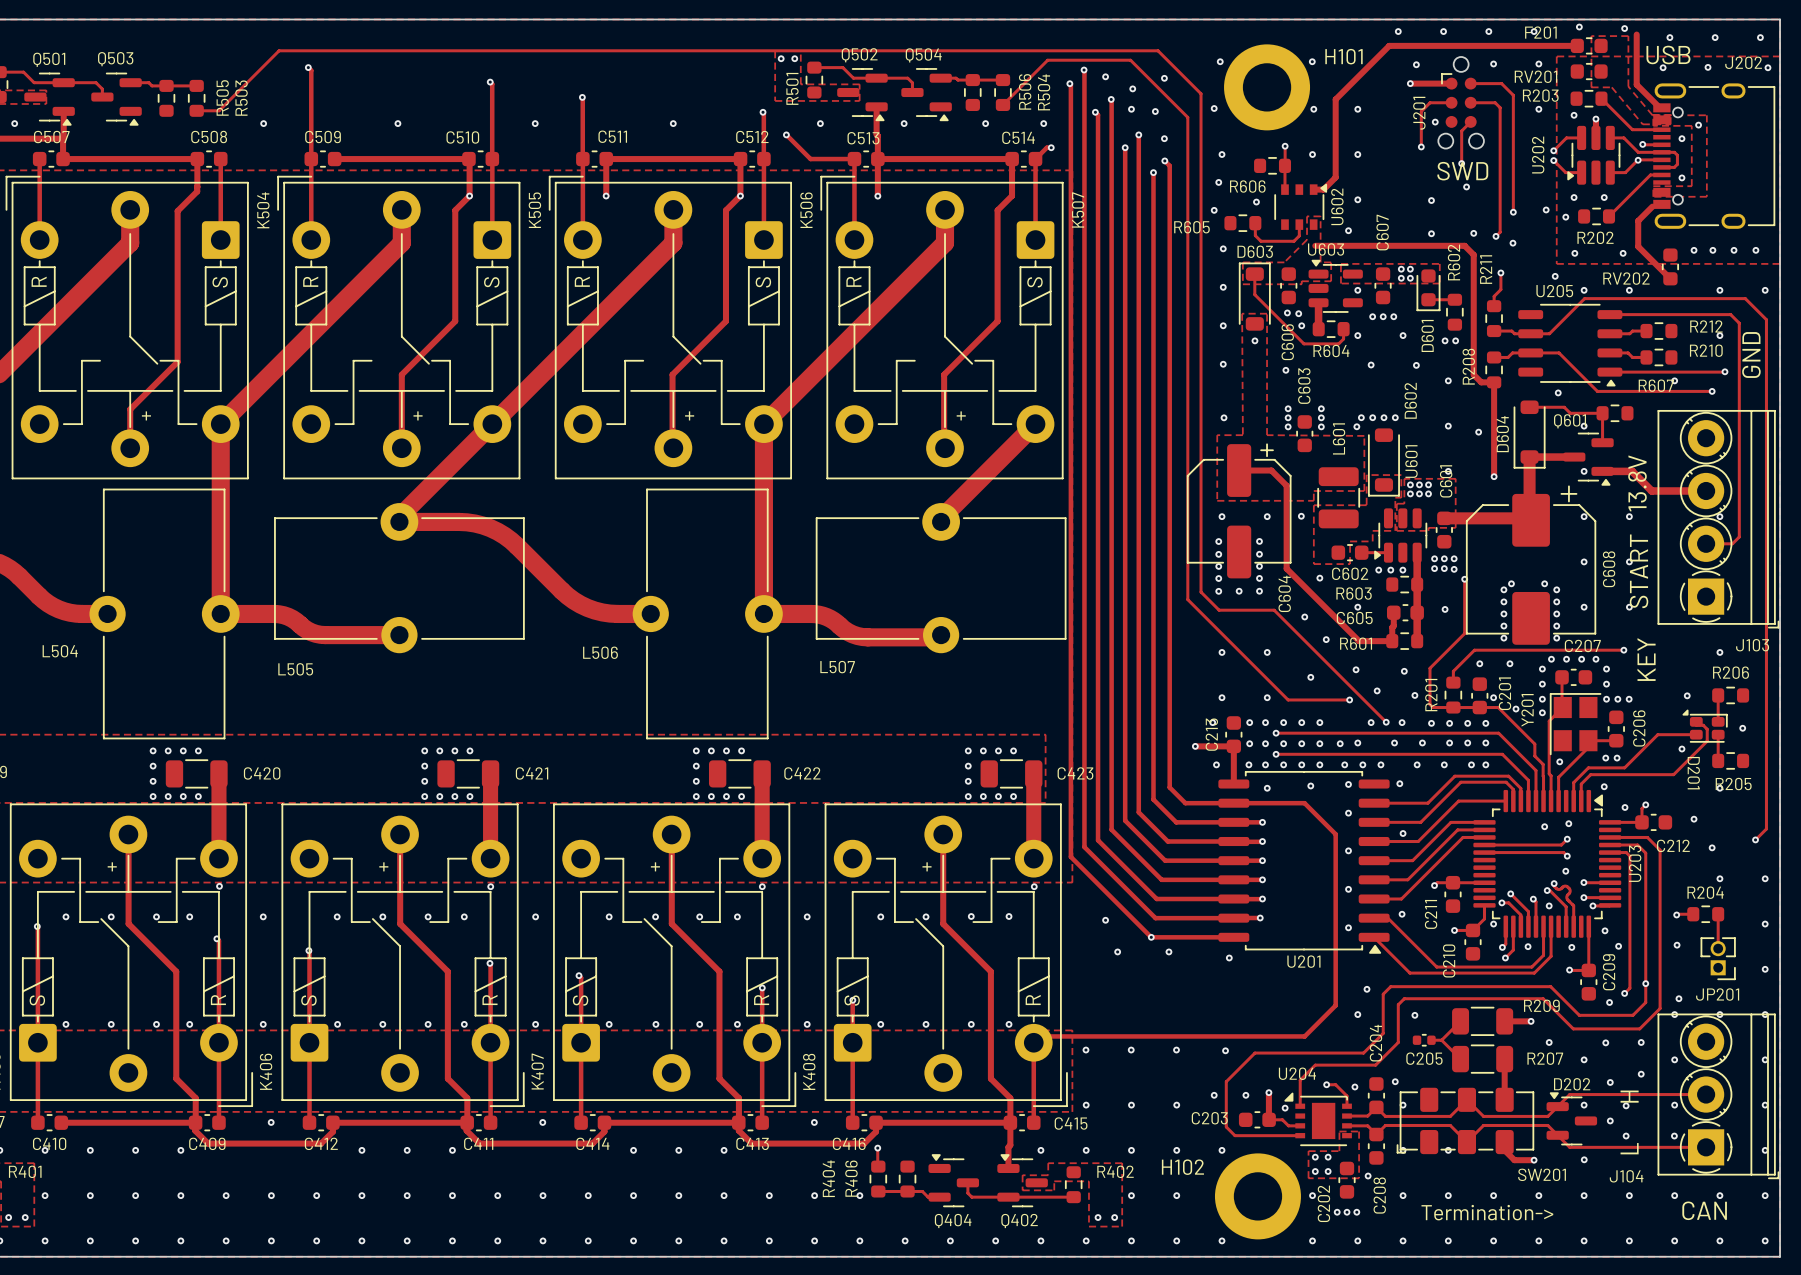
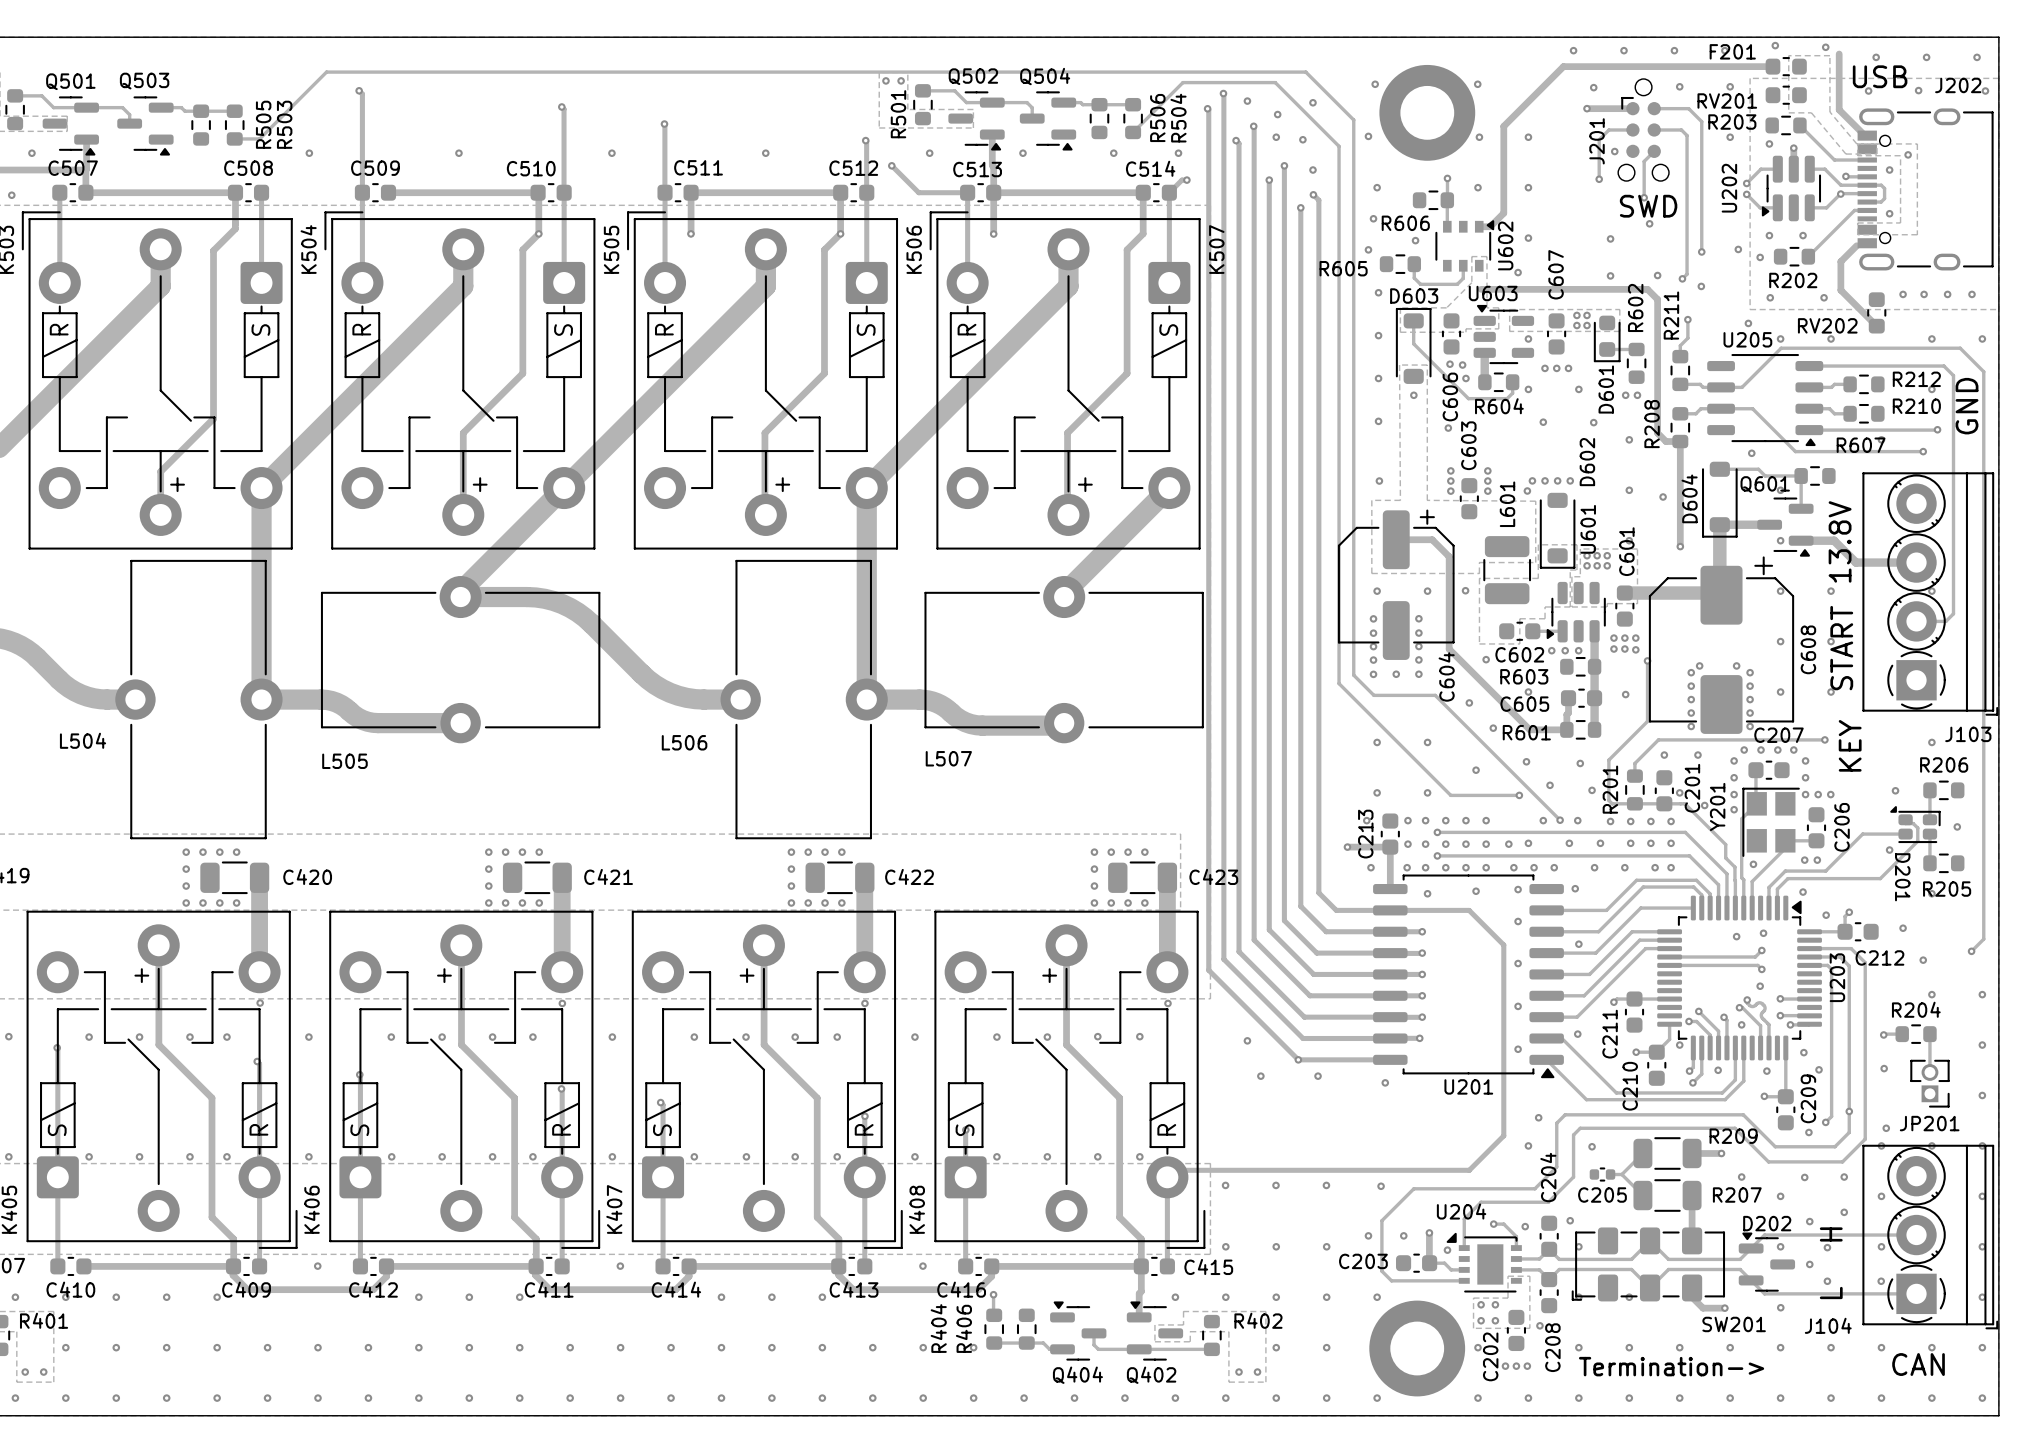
H101 name: H101 (1343, 56) -> none
H102 name: H102 (1182, 1167) -> none

